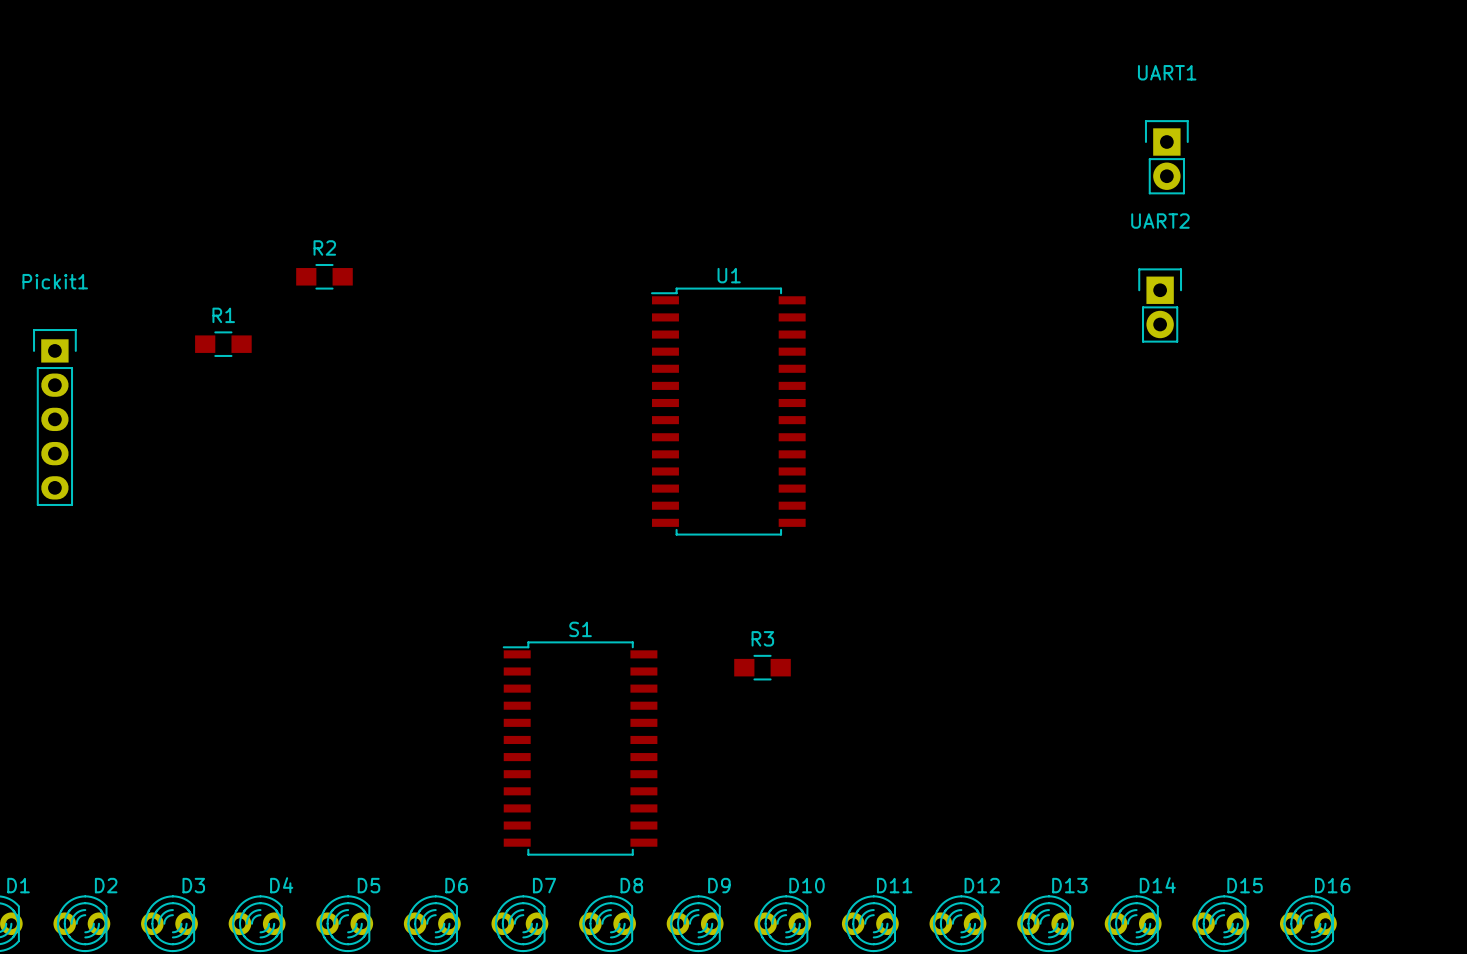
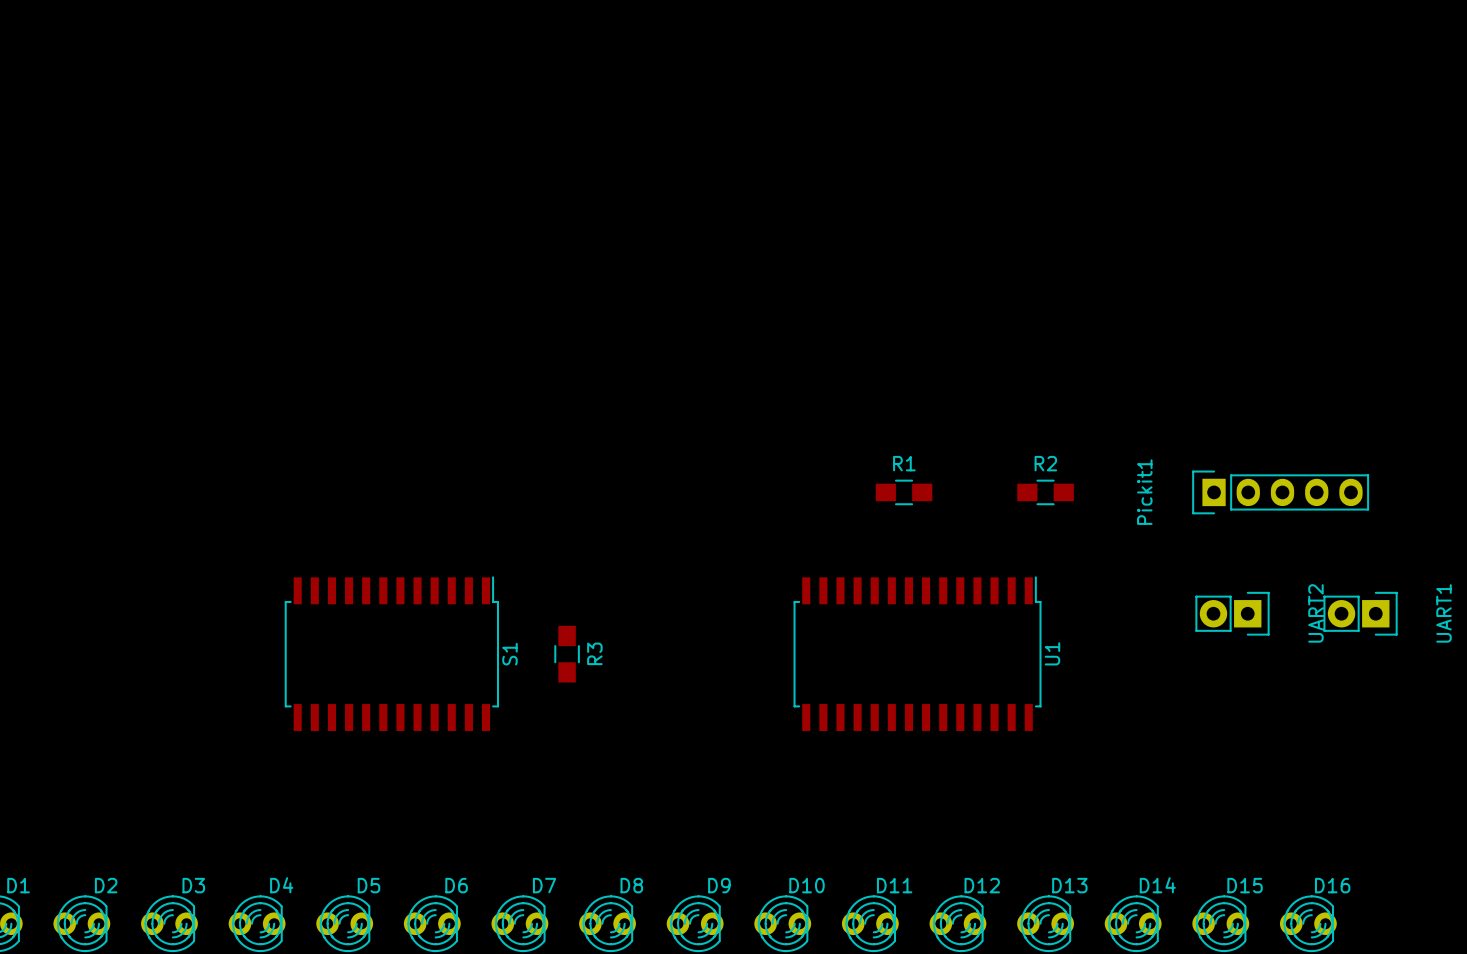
UART1 rotation: 0° (1166, 157) -> 90° clockwise (1360, 613)
UART1 position: (1166, 157) -> (1360, 613)
R2 position: (324, 276) -> (1045, 492)
UART2 rotation: 0° (1160, 305) -> 90° clockwise (1232, 613)
UART2 position: (1160, 305) -> (1232, 613)
R1 position: (223, 344) -> (904, 492)
U1 rotation: 0° (728, 411) -> 90° clockwise (917, 653)
U1 position: (728, 411) -> (917, 653)
Pickit1 rotation: 0° (54, 417) -> 90° counterclockwise (1280, 492)
Pickit1 position: (54, 417) -> (1280, 492)
R3 rotation: 0° (762, 667) -> 90° clockwise (567, 654)
R3 position: (762, 667) -> (567, 654)
S1 rotation: 0° (580, 748) -> 90° clockwise (391, 653)
S1 position: (580, 748) -> (391, 653)

